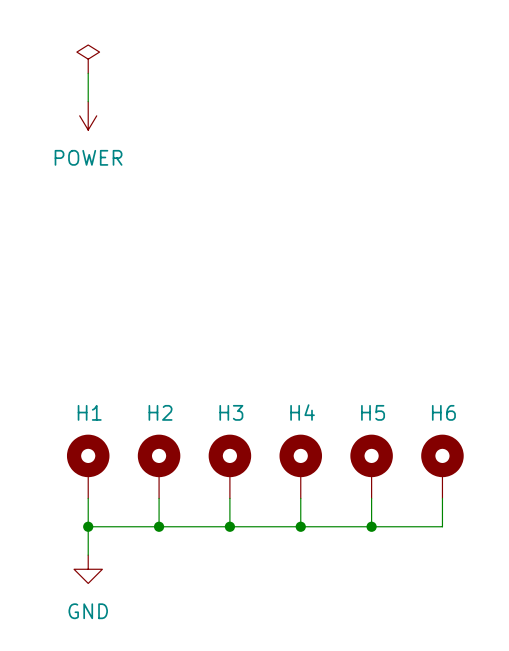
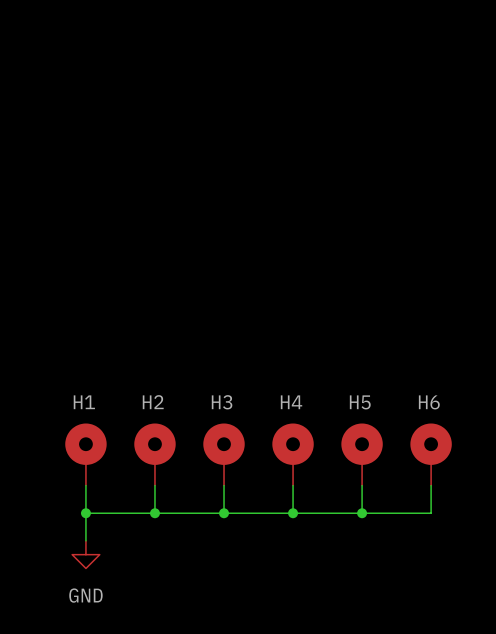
power symbol: (88, 59) -> none
wire: (88, 73) (88, 101) -> none
power symbol: POWER (88, 115) -> none

